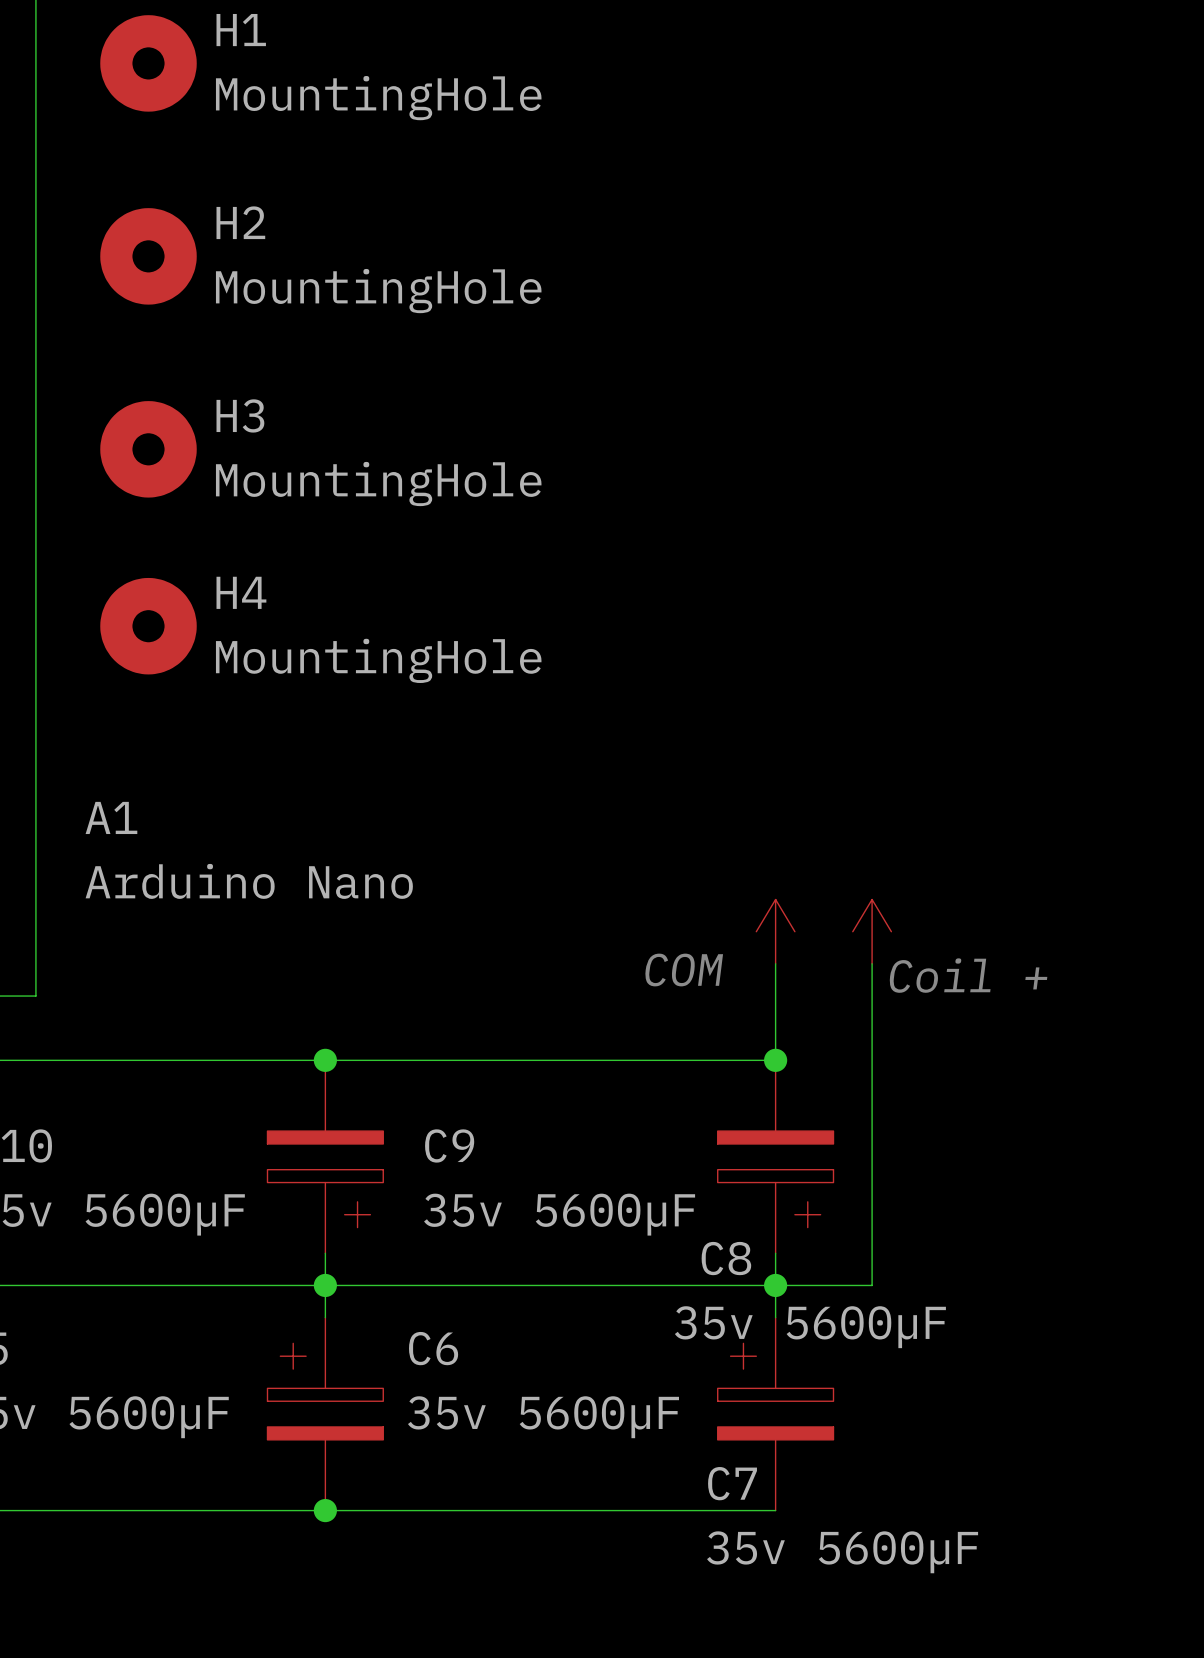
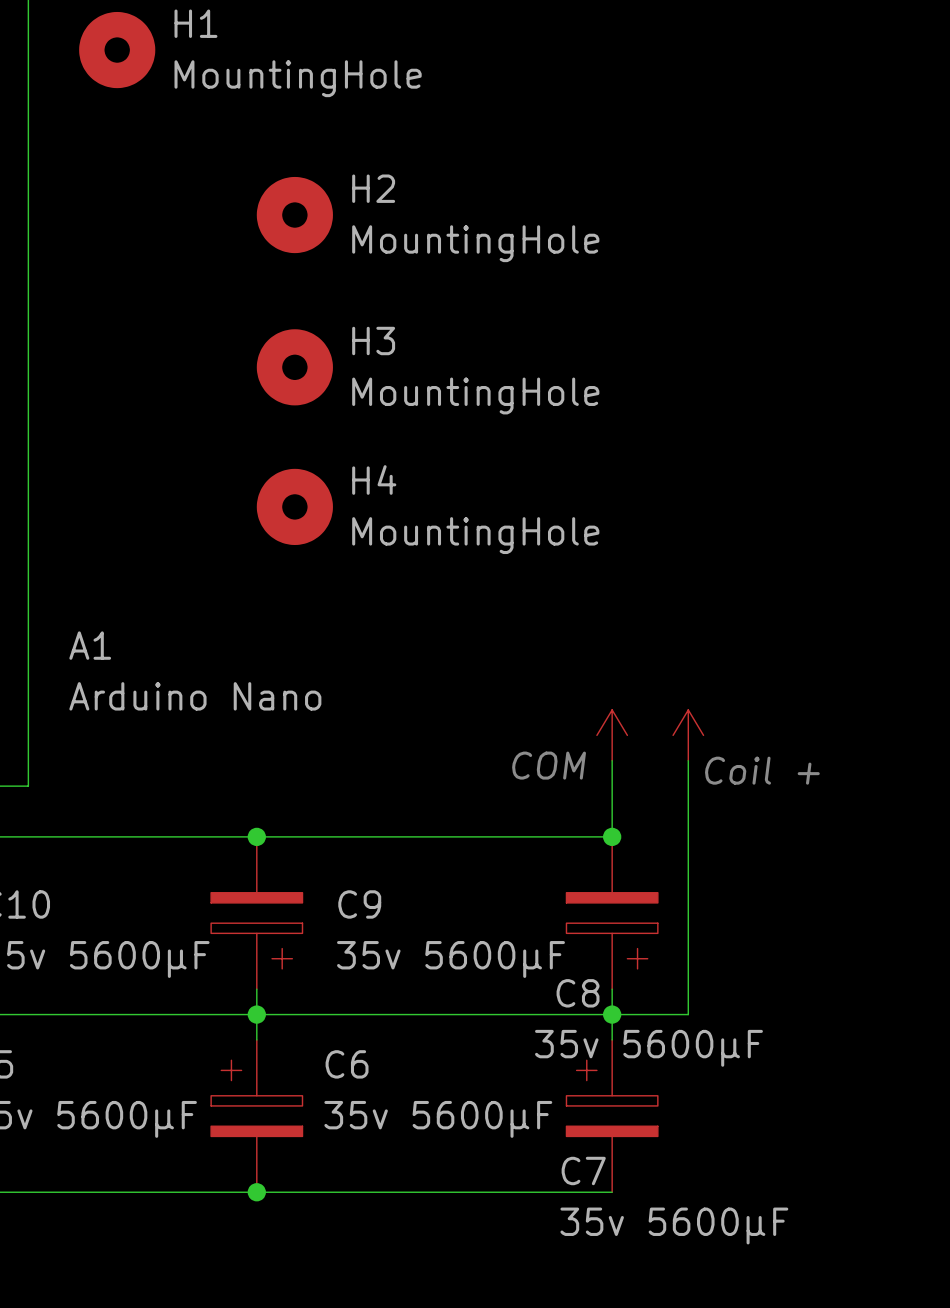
H2 position: (148, 256) -> (294, 215)
H3 position: (148, 449) -> (294, 367)
H4 position: (148, 626) -> (294, 506)

